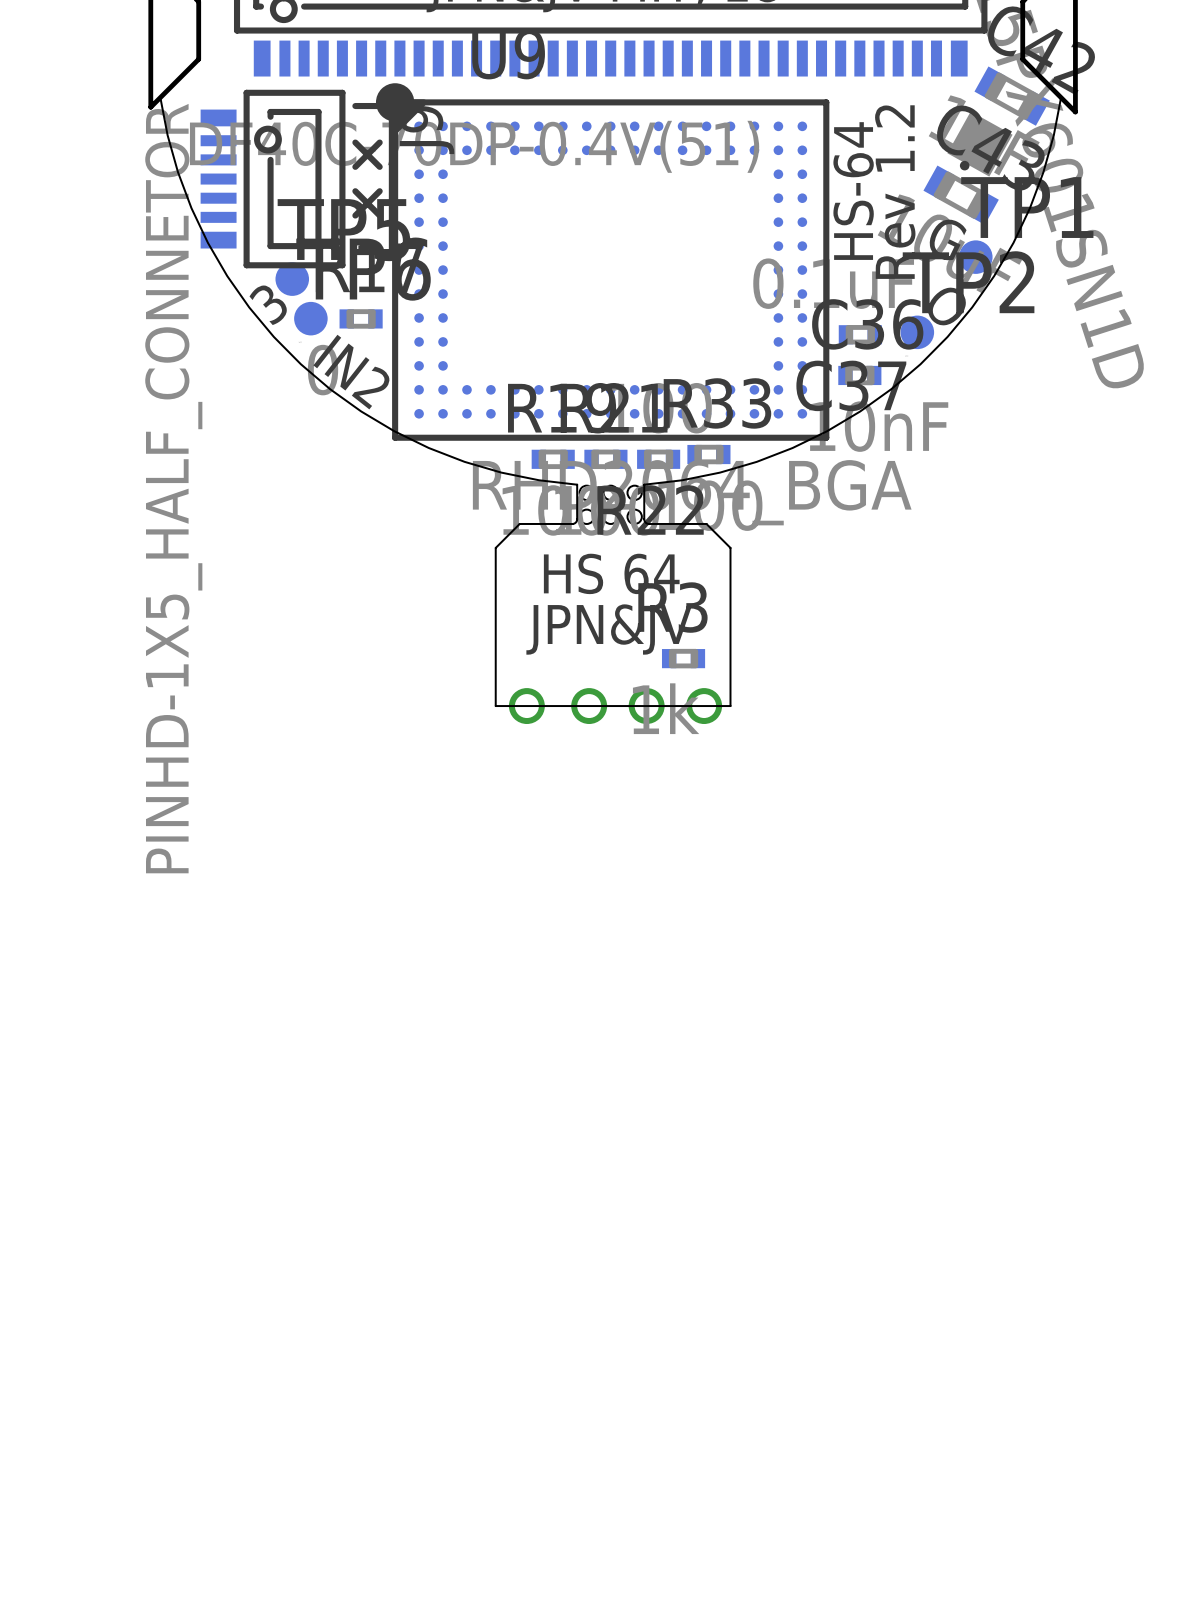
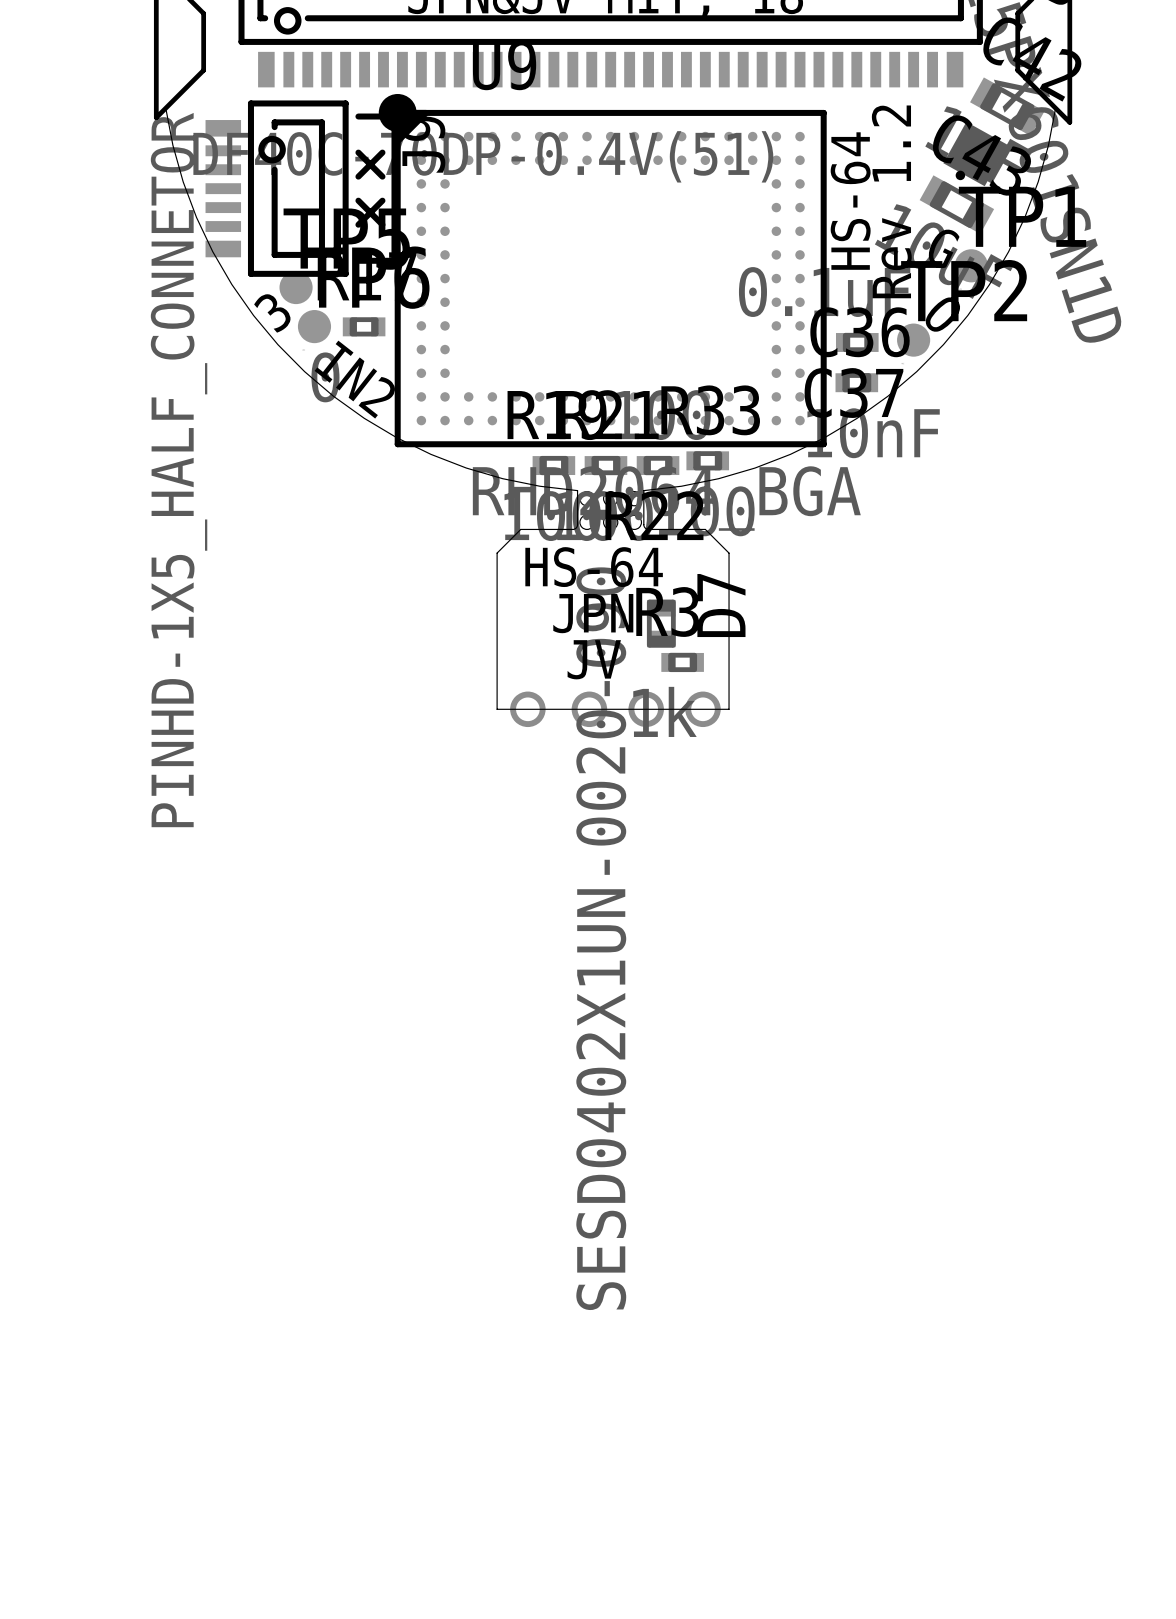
text: HS 64 (611, 573) -> HS-64 (594, 567)
D7: none -> SESD0402X1UN-0020-090 (661, 623)
text: JPN&JV (609, 629) -> JPN (593, 613)
text: none -> JV (594, 659)

